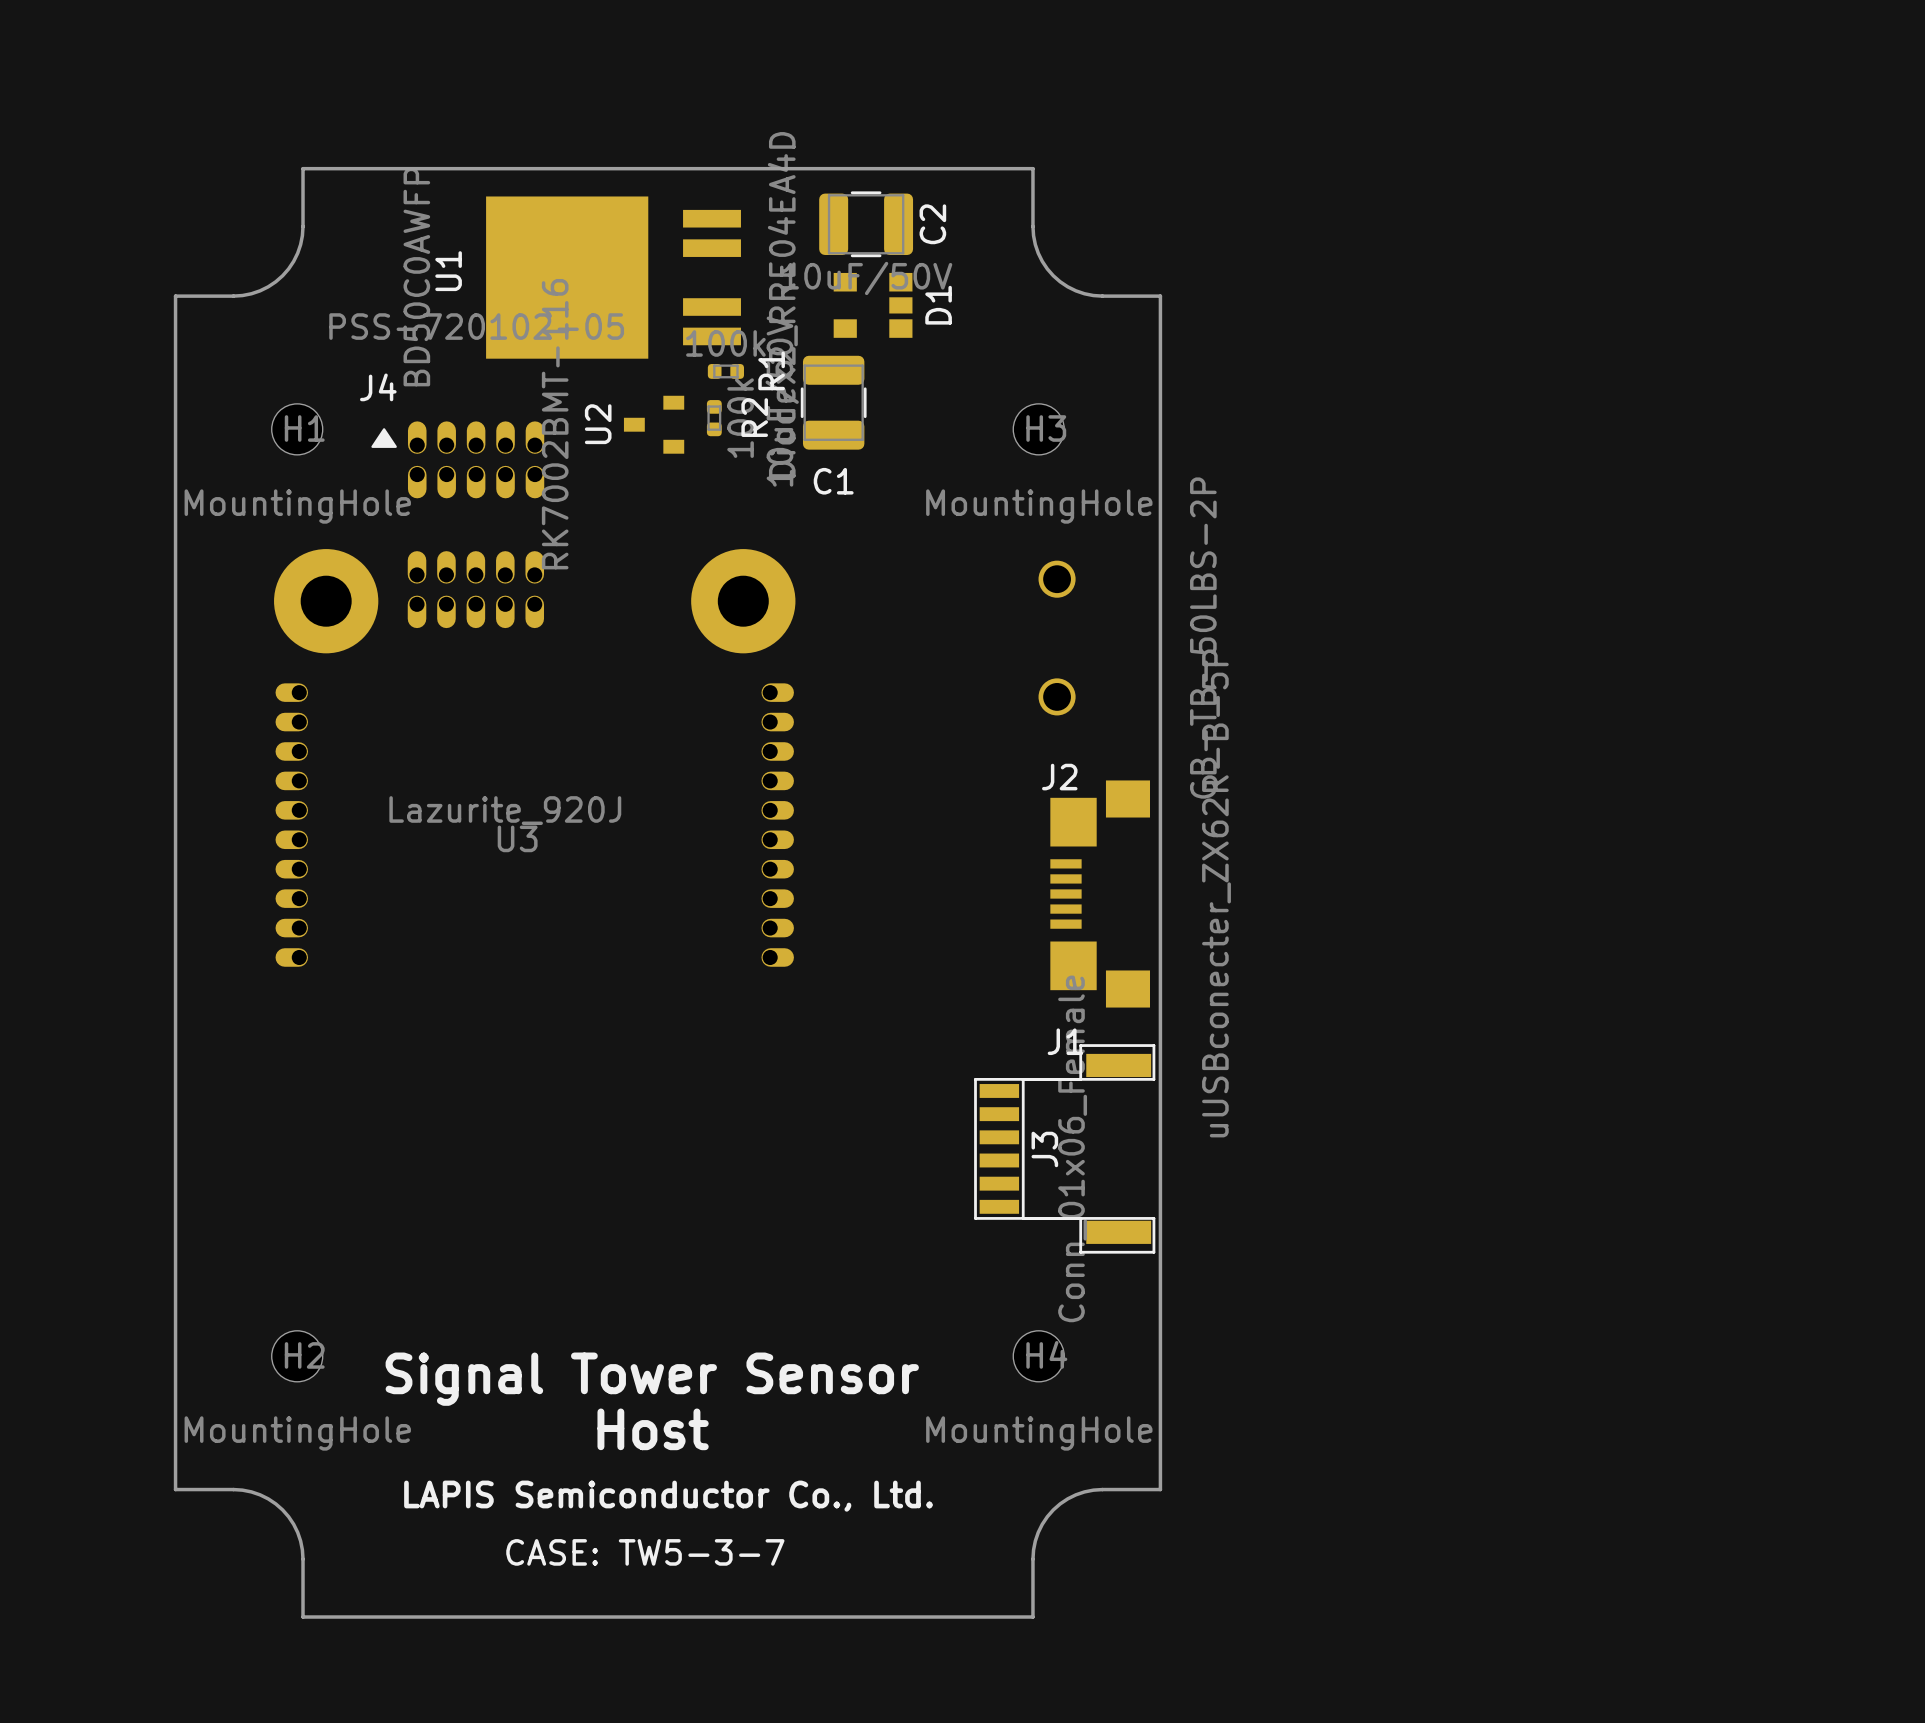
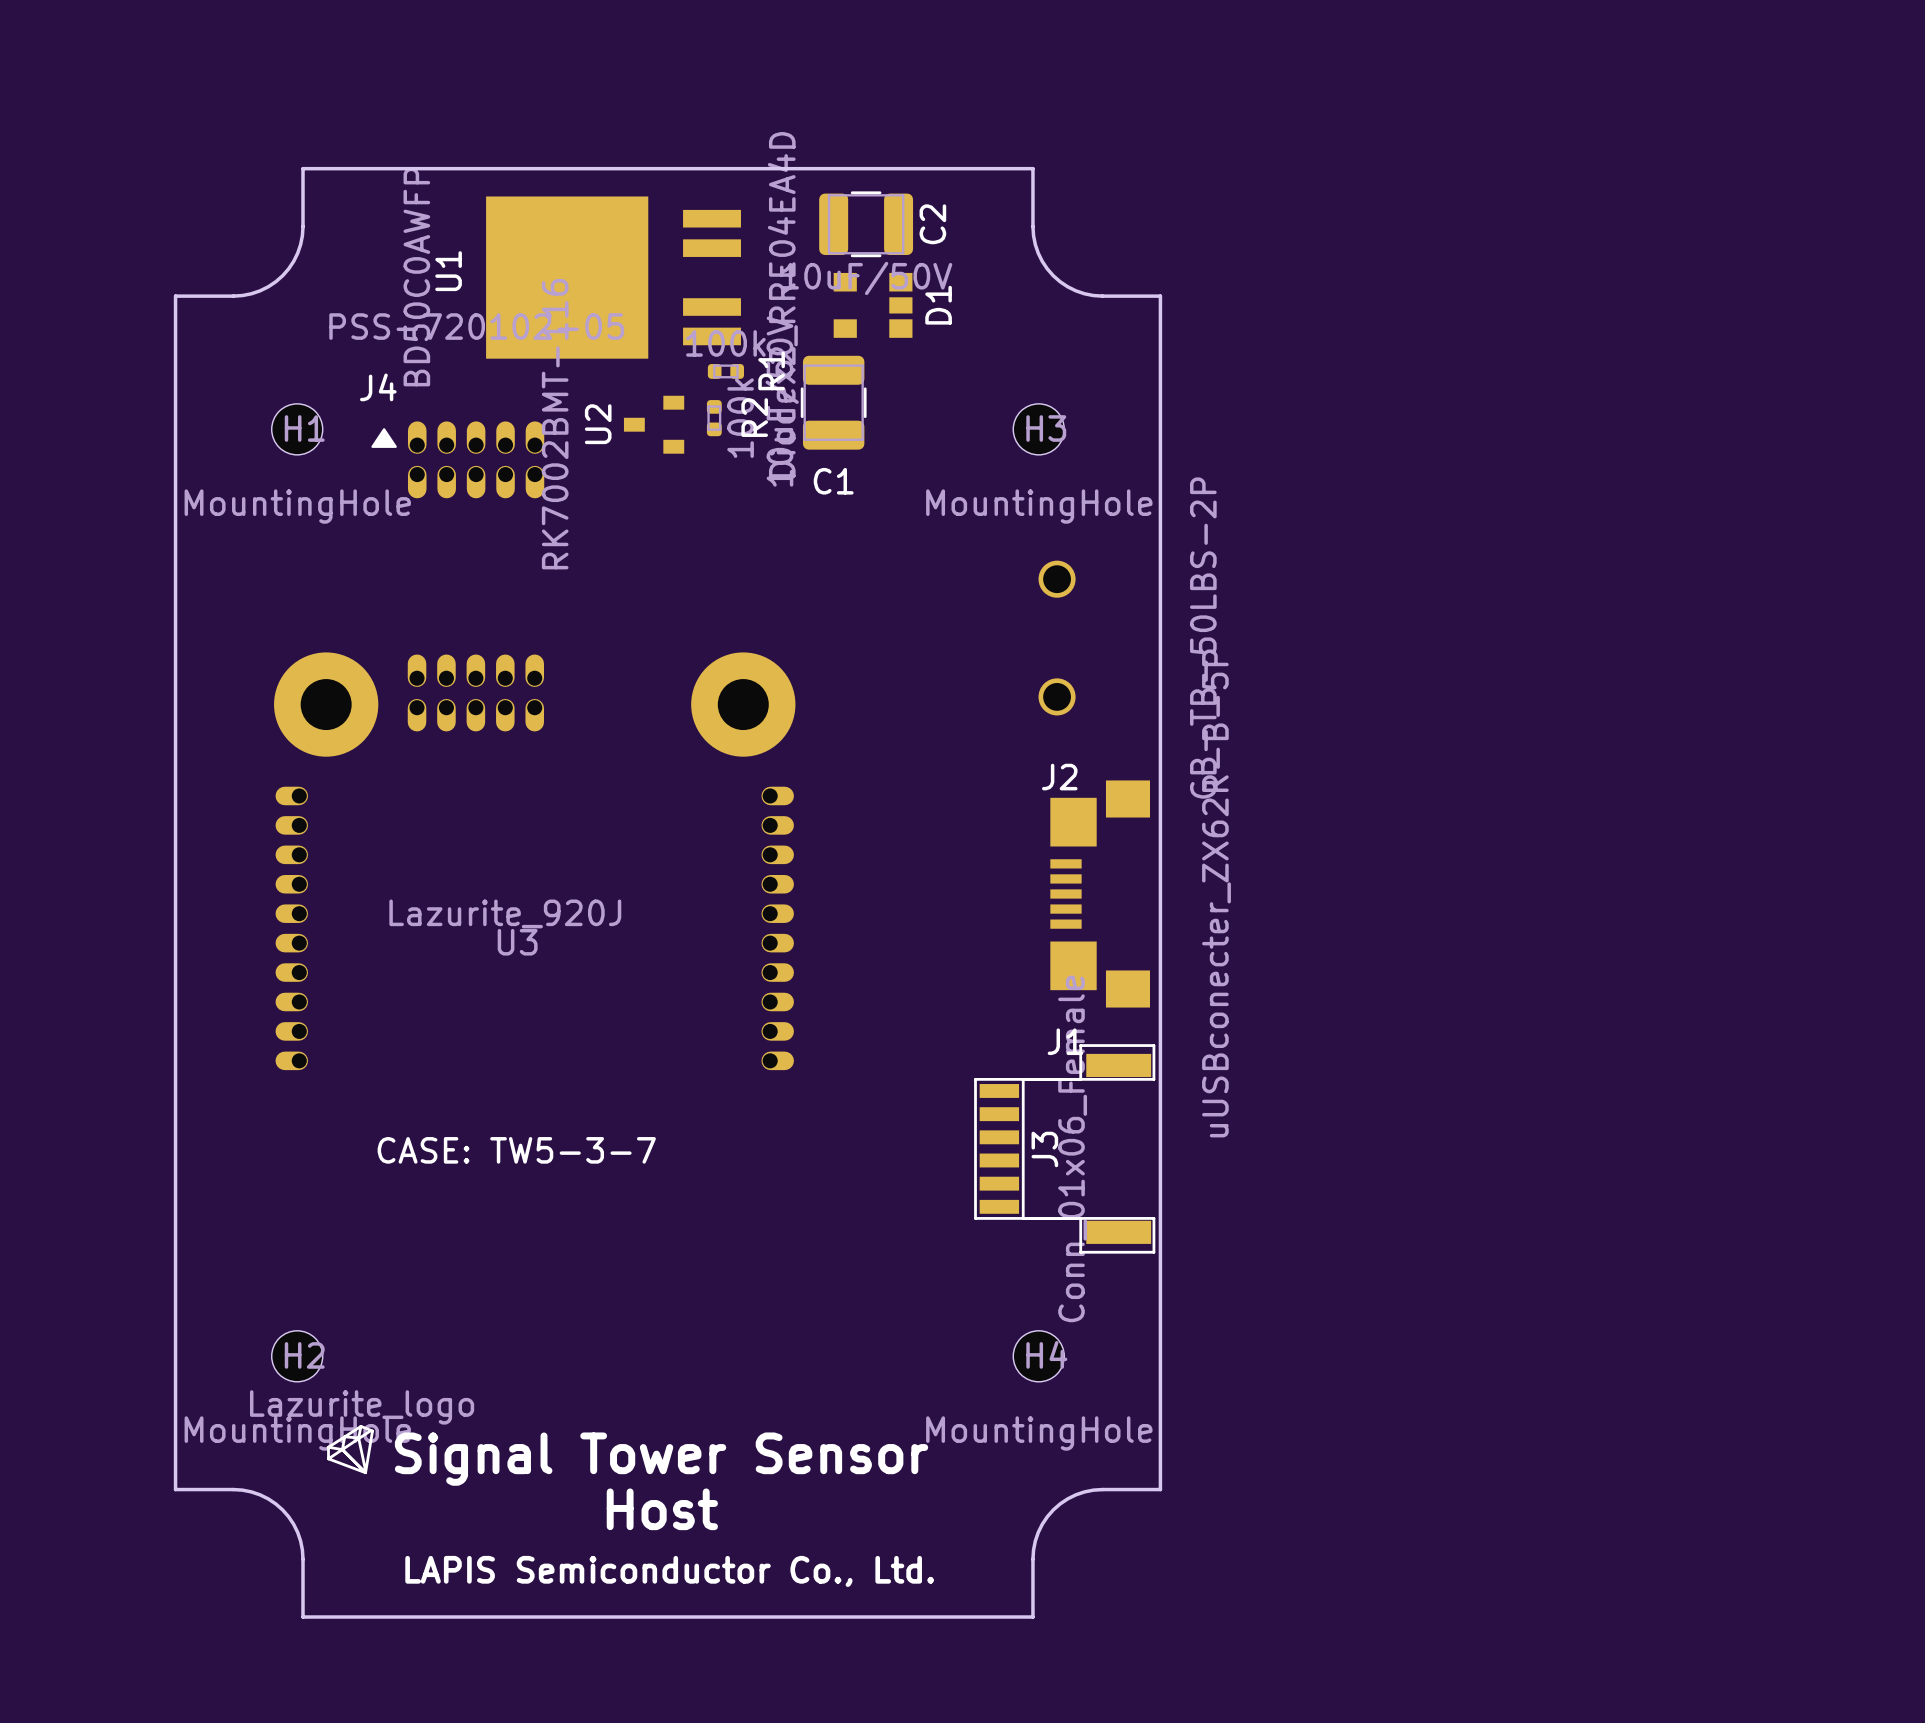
U3 position: (534, 757) -> (534, 861)
text position: Signal Tower Sensor (652, 1379) -> Signal Tower Sensor (661, 1459)
drawing: none -> [327, 1425, 374, 1475]
text: Host (653, 1429) -> none
text: LAPIS Semiconductor Co., Ltd. (668, 1496) -> Host (662, 1509)
text position: CASE: TW5-3-7 (645, 1552) -> CASE: TW5-3-7 (516, 1150)
text: none -> LAPIS Semiconductor Co., Ltd. (669, 1571)

